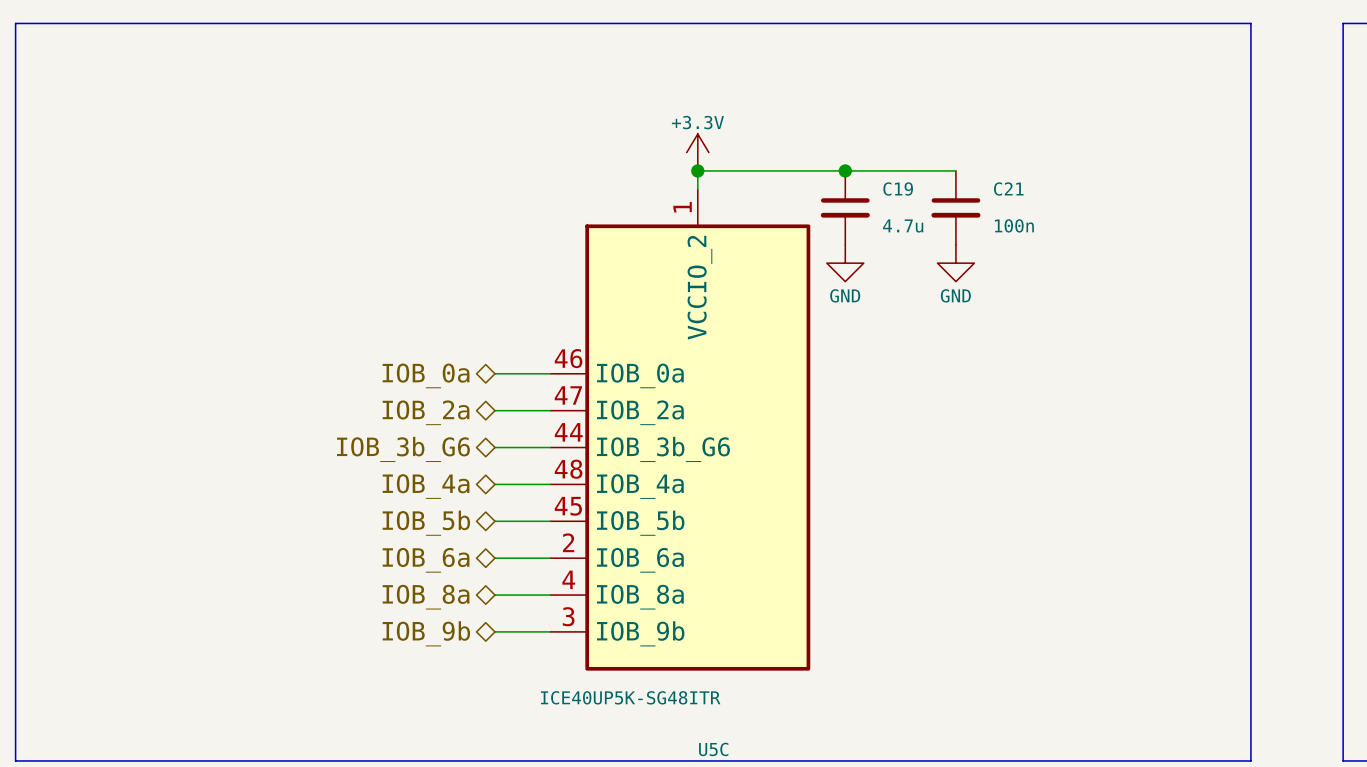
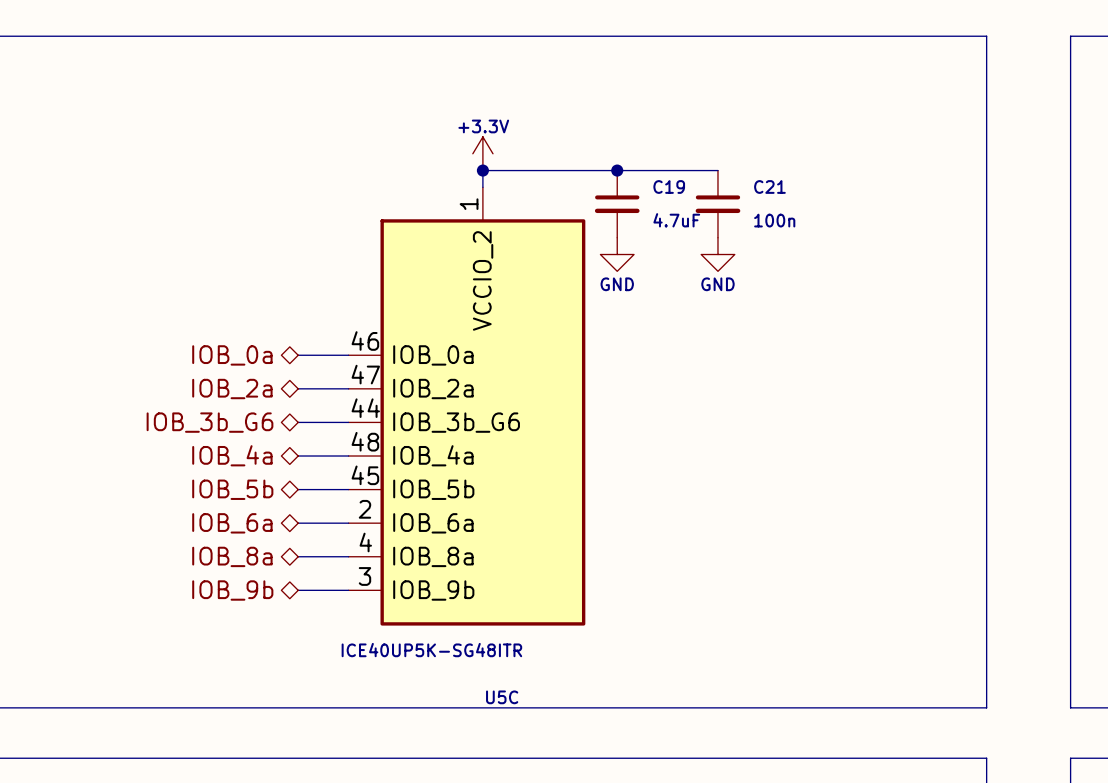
C19 value: 4.7u (903, 226) -> 4.7uF (676, 220)

